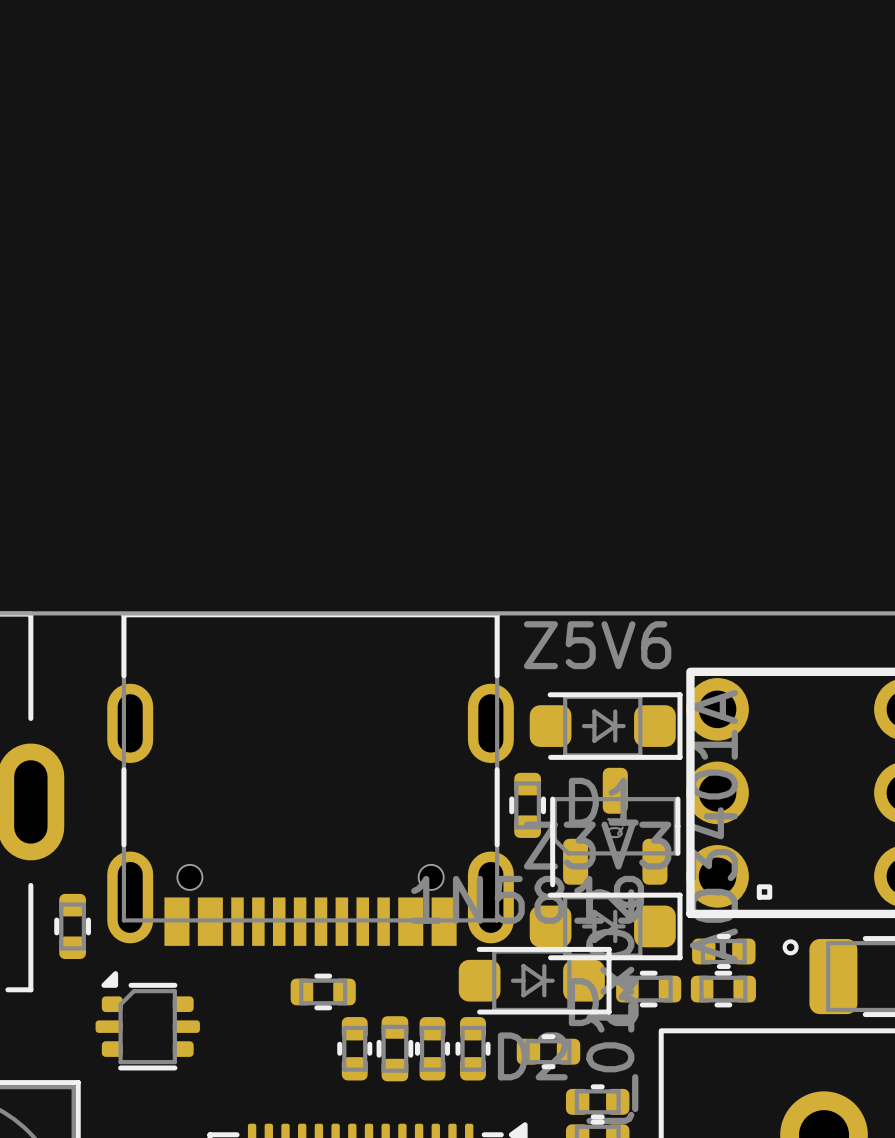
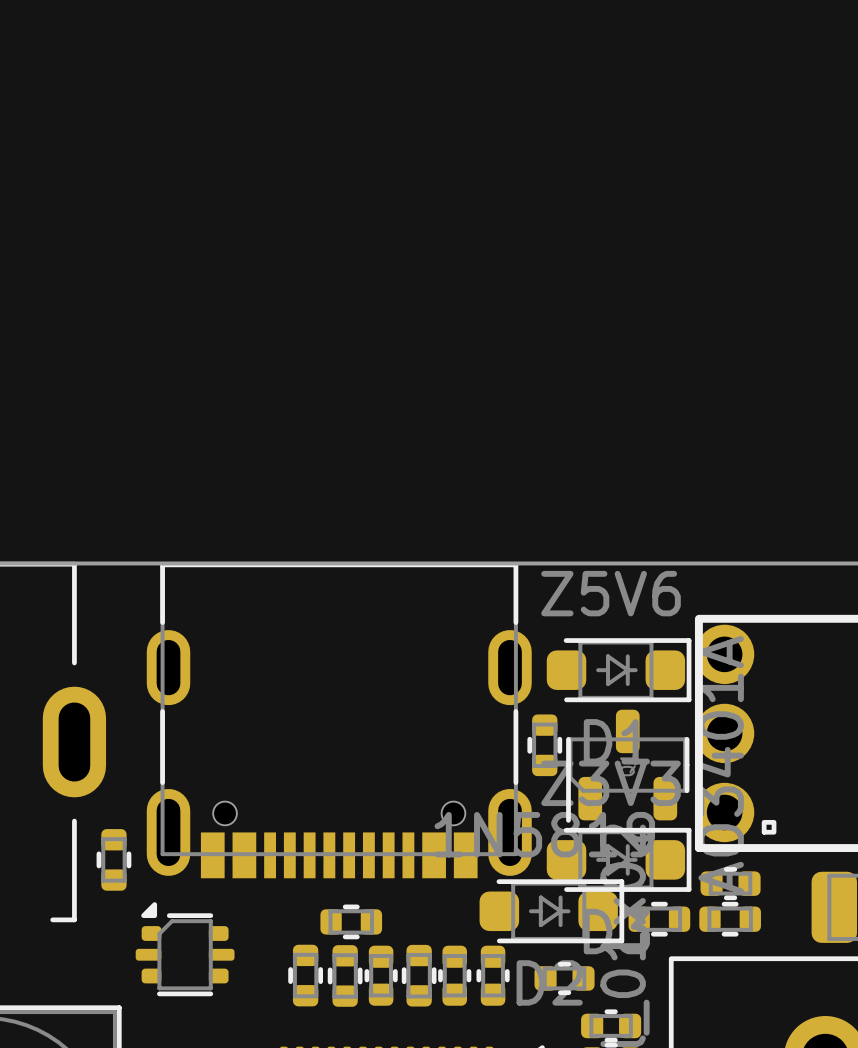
drawing: [782, 939, 799, 956] -> none
part: none -> (305, 975)
part: none -> (345, 975)

